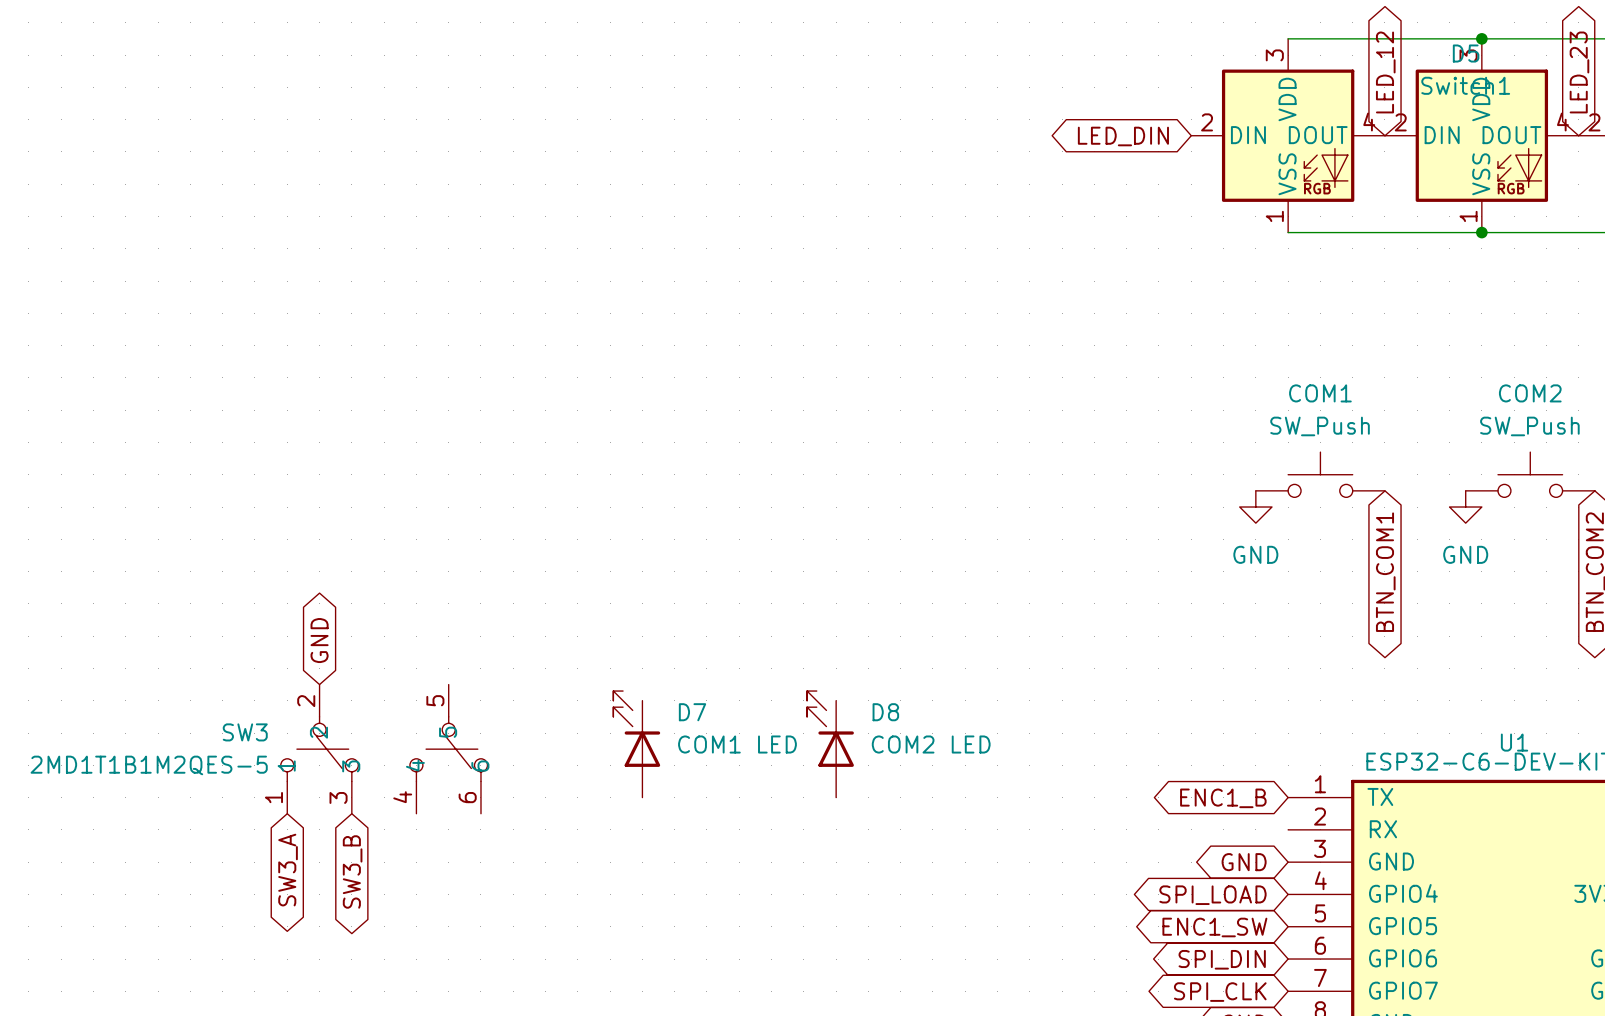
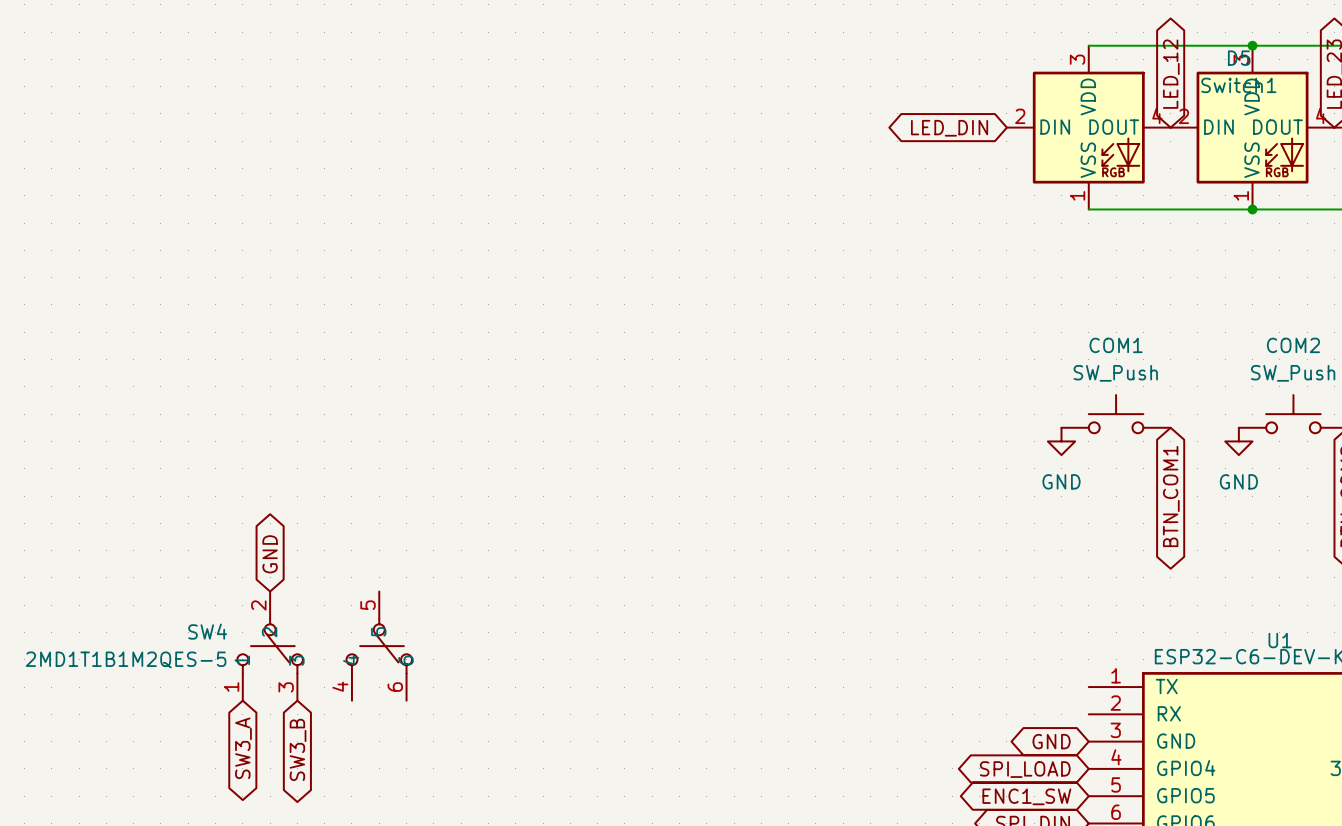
SW3 name: SW3 (245, 732) -> SW4 (207, 631)
D7: COM1 LED (636, 744) -> none
D8: COM2 LED (830, 744) -> none
global label: ENC1_B (1223, 798) -> none

